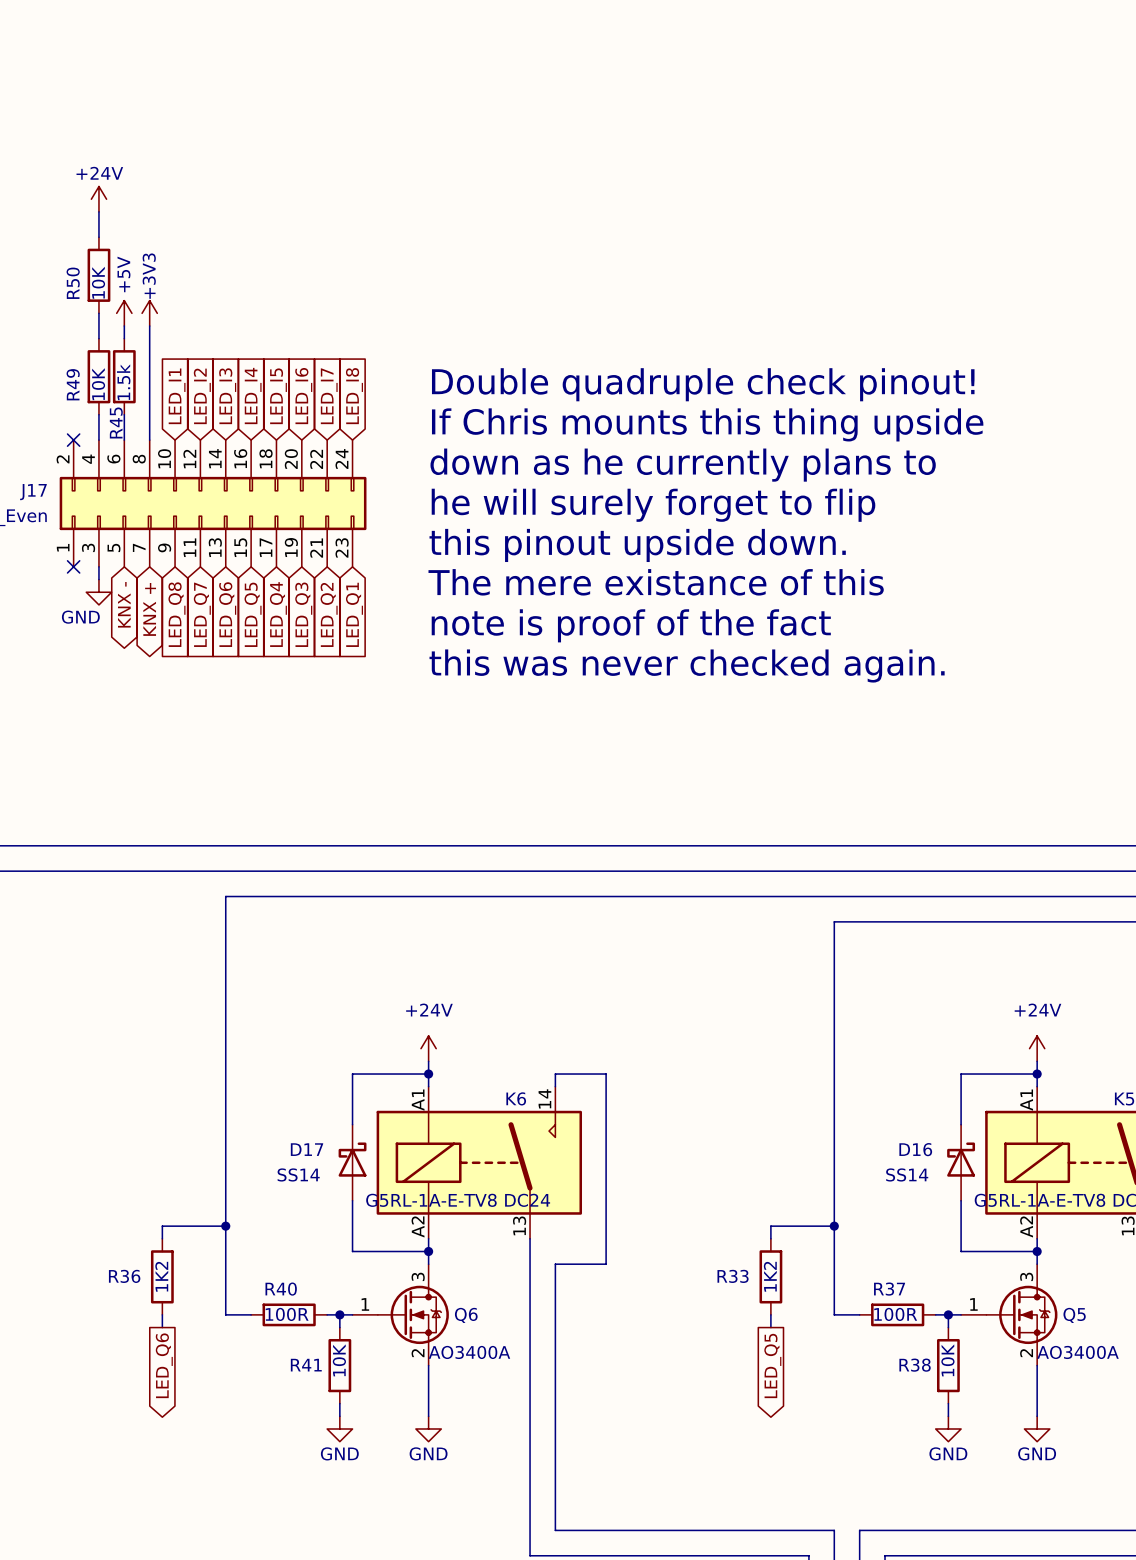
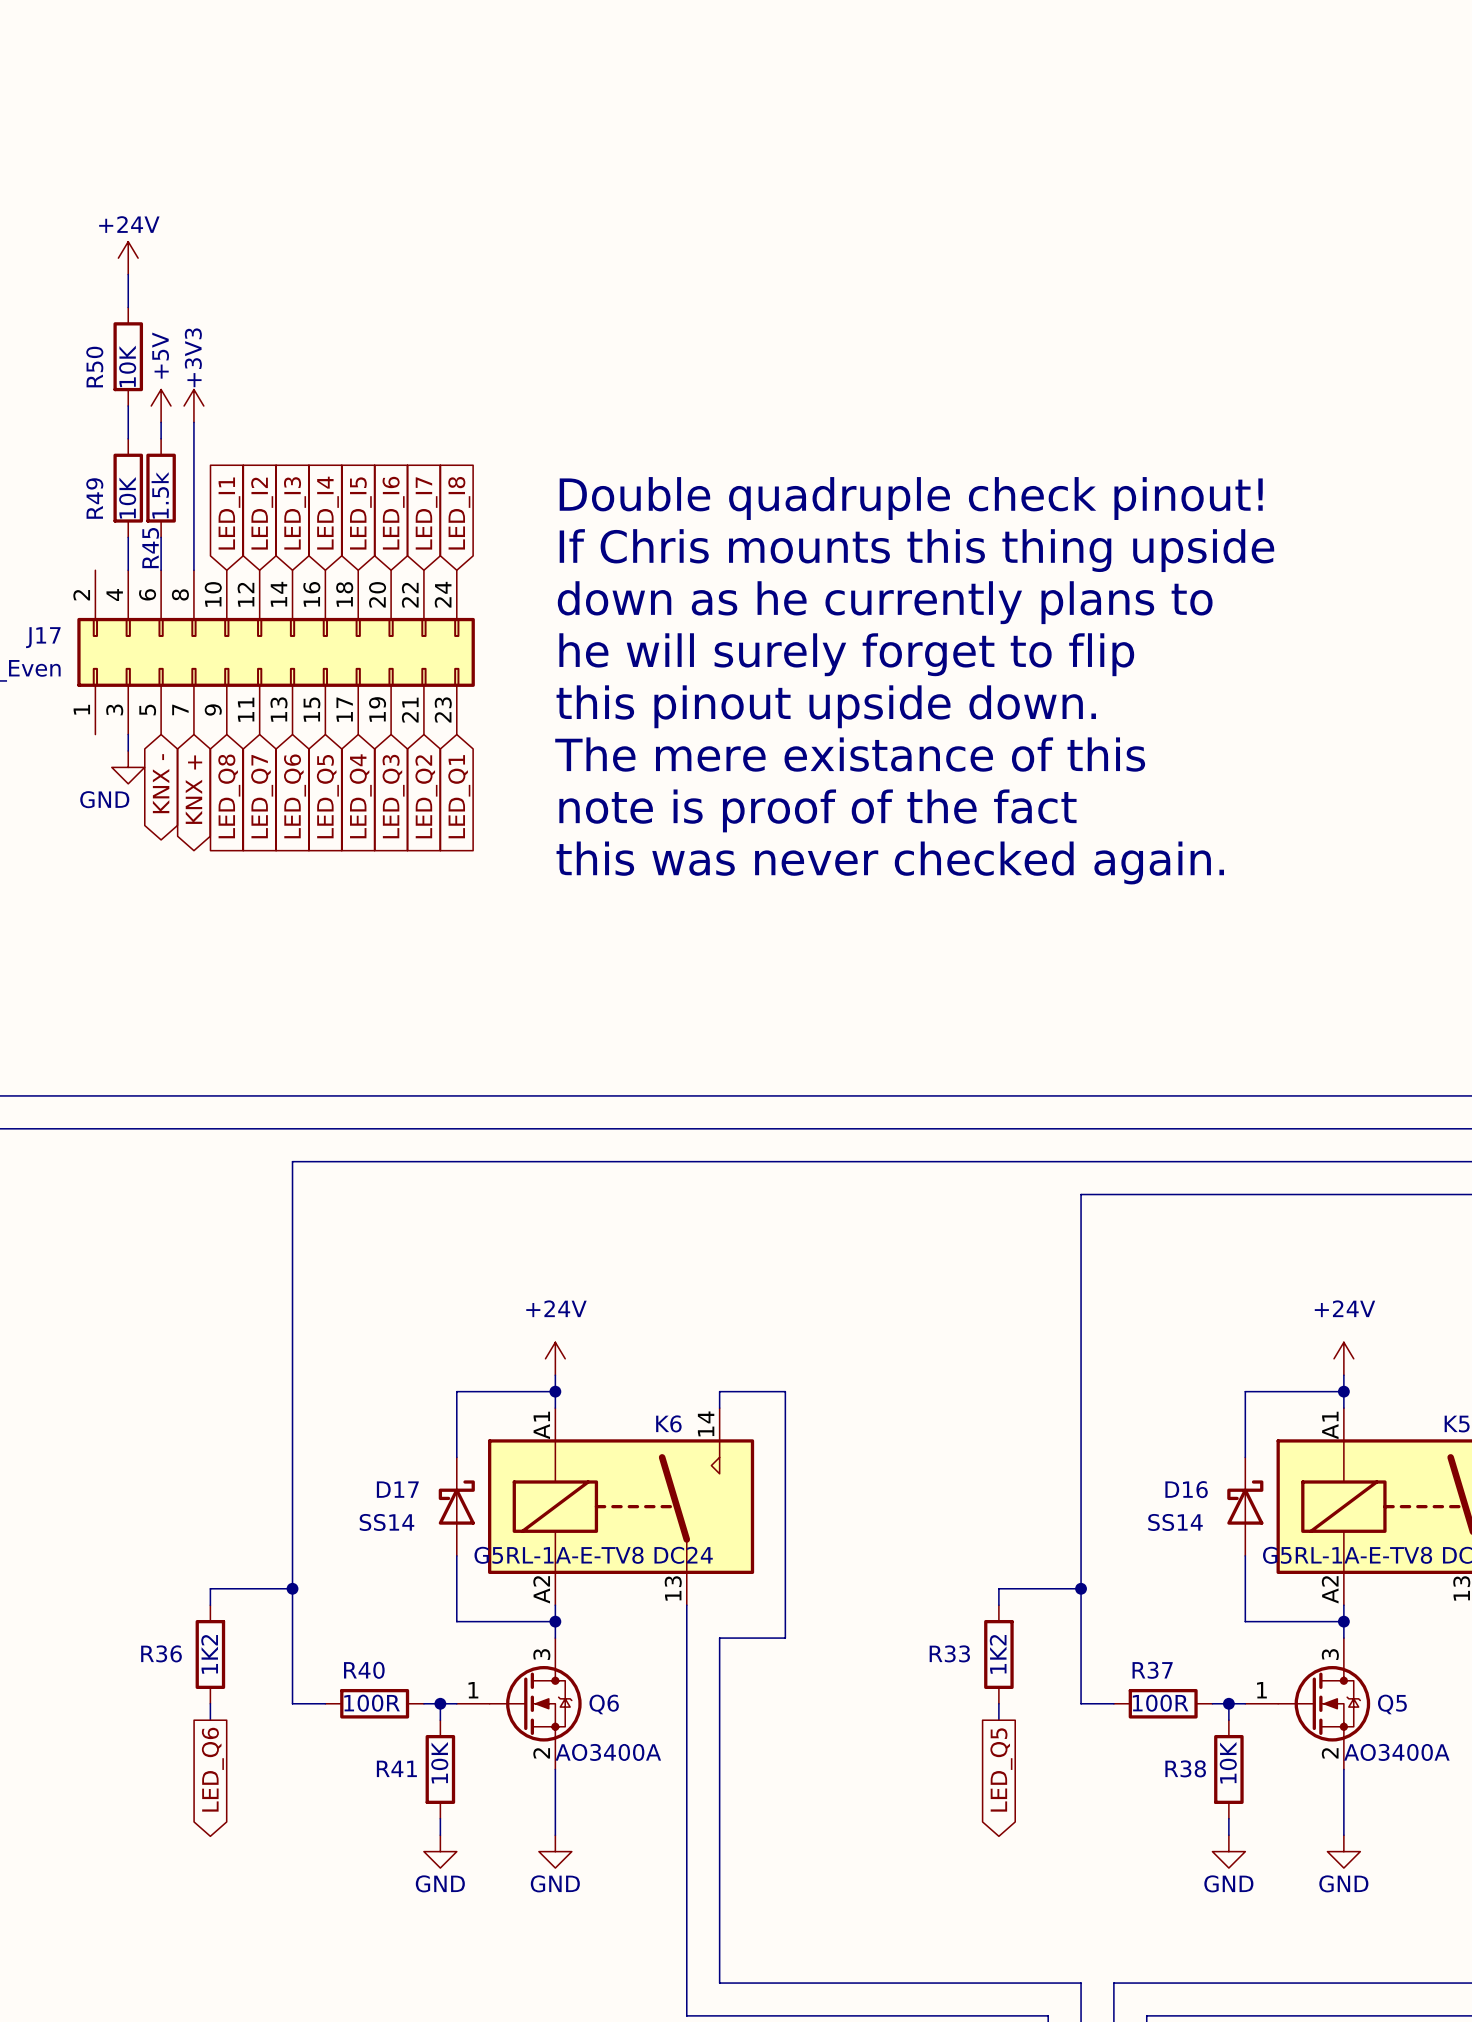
no-connect mark: (73, 440) -> none
no-connect mark: (73, 566) -> none

